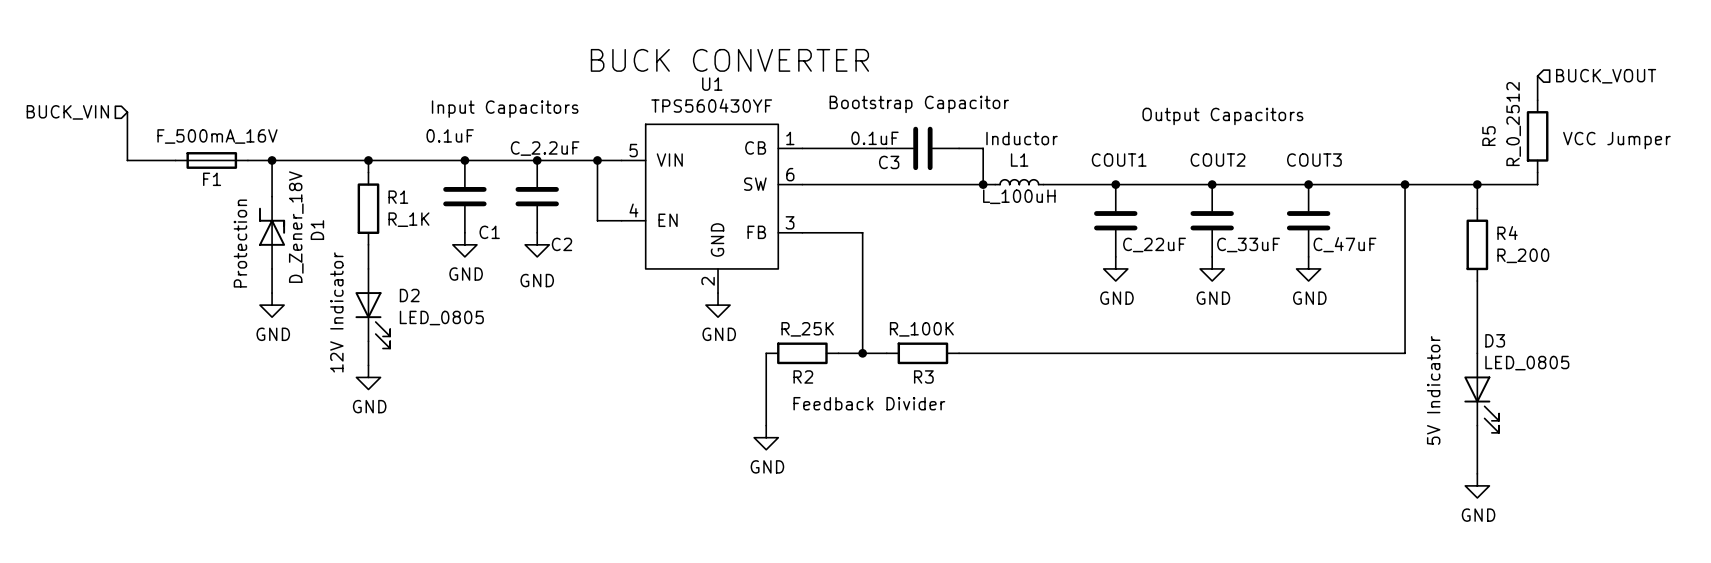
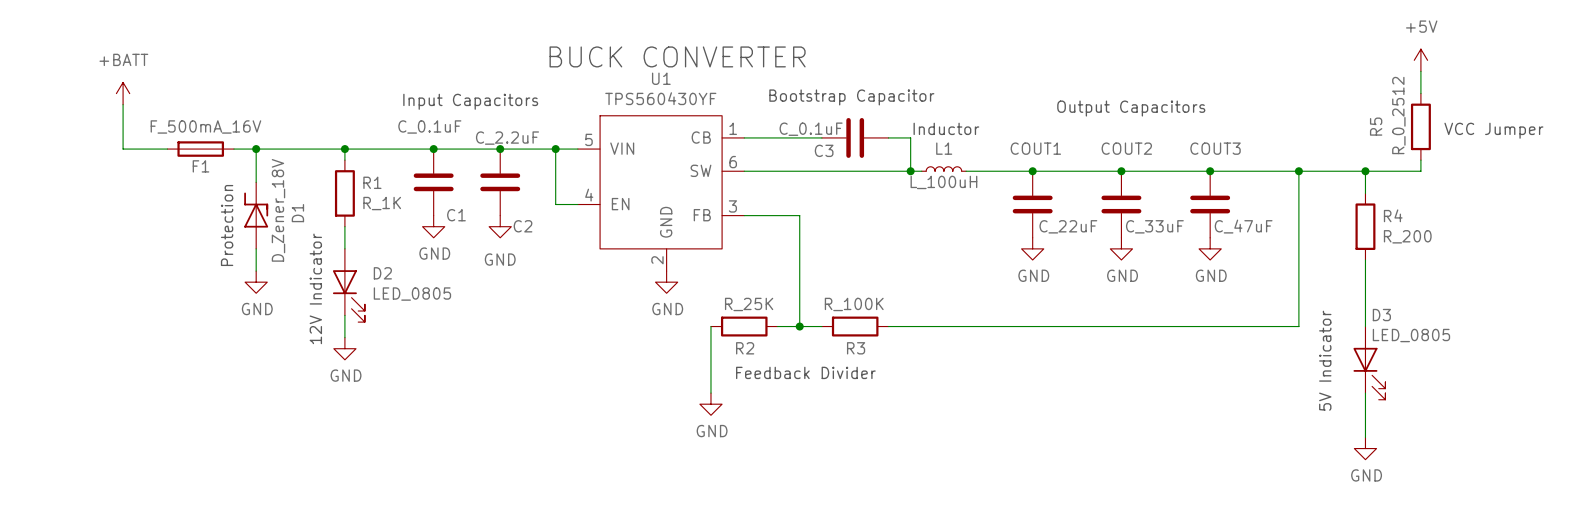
power symbol: none -> +5V (1420, 60)
hierarchical label: BUCK_VOUT (1606, 76) -> none
power symbol: none -> +BATT (123, 93)
hierarchical label: BUCK_VIN (67, 112) -> none
C1 value: 0.1uF (450, 135) -> C_0.1uF (429, 126)
C3 value: 0.1uF (874, 138) -> C_0.1uF (811, 129)

